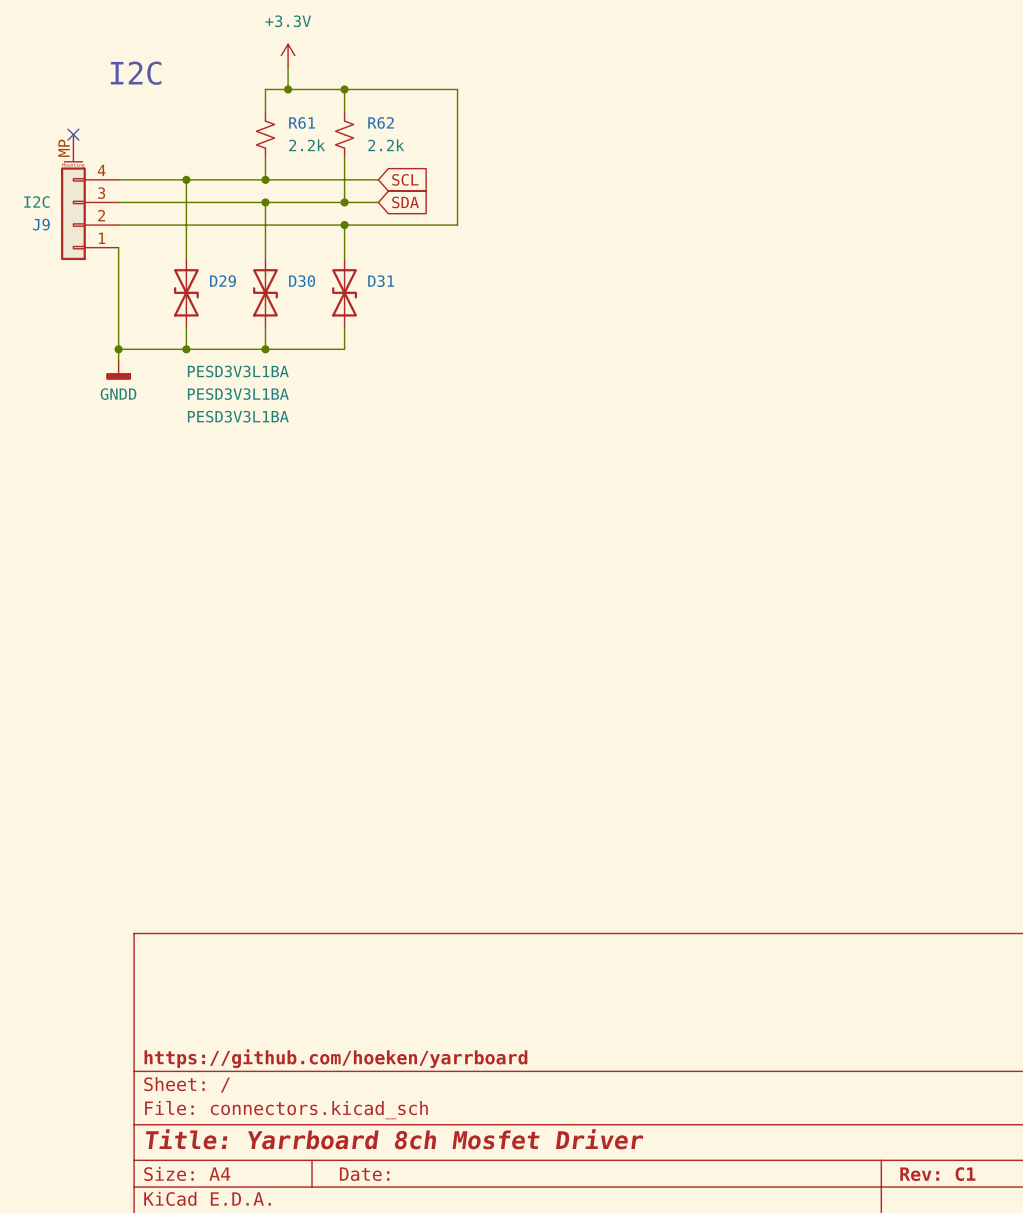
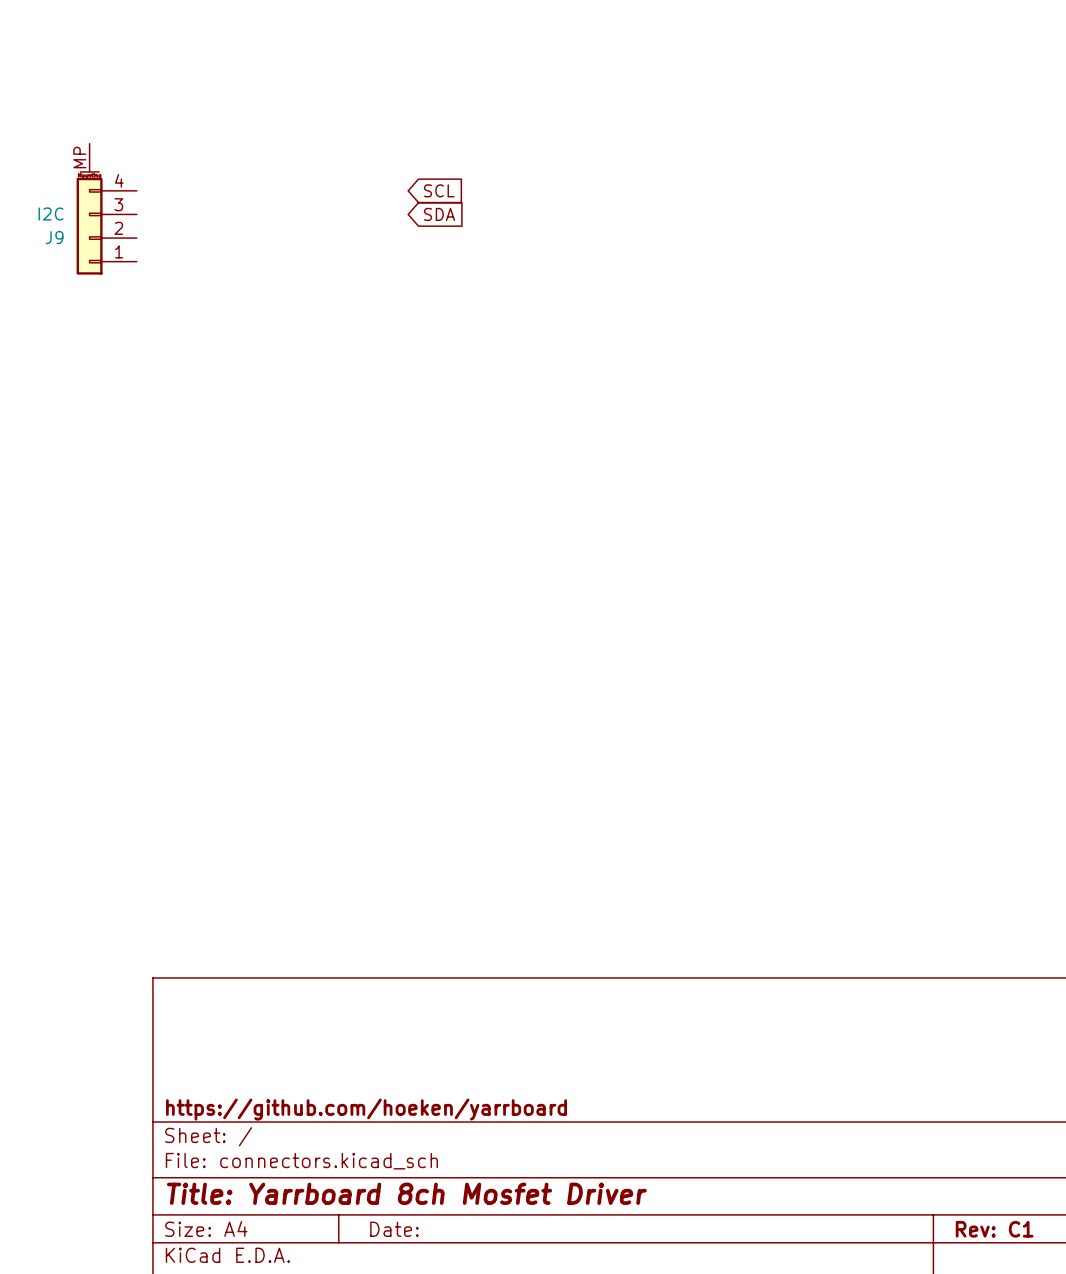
power symbol: +3.3V (288, 55) -> none
wire: (288, 66) (288, 89) -> none
text: I2C (136, 73) -> none
junction: (288, 89) -> none
wire: (344, 89) (344, 112) -> none
junction: (344, 89) -> none
wire: (265, 112) (265, 89) (457, 89) (457, 225) (118, 225) -> none
no-connect mark: (73, 134) -> none
R61: 2.2k (265, 134) -> none
R62: 2.2k (344, 134) -> none
wire: (265, 157) (265, 179) -> none
wire: (344, 157) (344, 202) -> none
wire: (118, 179) (378, 179) -> none
wire: (186, 179) (186, 258) -> none
junction: (186, 179) -> none
junction: (265, 179) -> none
wire: (118, 202) (378, 202) -> none
wire: (265, 202) (265, 258) -> none
junction: (265, 202) -> none
junction: (344, 202) -> none
wire: (344, 225) (344, 258) -> none
junction: (344, 225) -> none
wire: (118, 247) (118, 360) -> none
D29: PESD3V3L1BA (186, 292) -> none
D30: PESD3V3L1BA (265, 292) -> none
D31: PESD3V3L1BA (344, 292) -> none
wire: (186, 326) (186, 349) -> none
wire: (265, 326) (265, 349) -> none
wire: (344, 326) (344, 349) (118, 349) -> none
junction: (118, 349) -> none
junction: (186, 349) -> none
junction: (265, 349) -> none
power symbol: GNDD (118, 370) -> none

